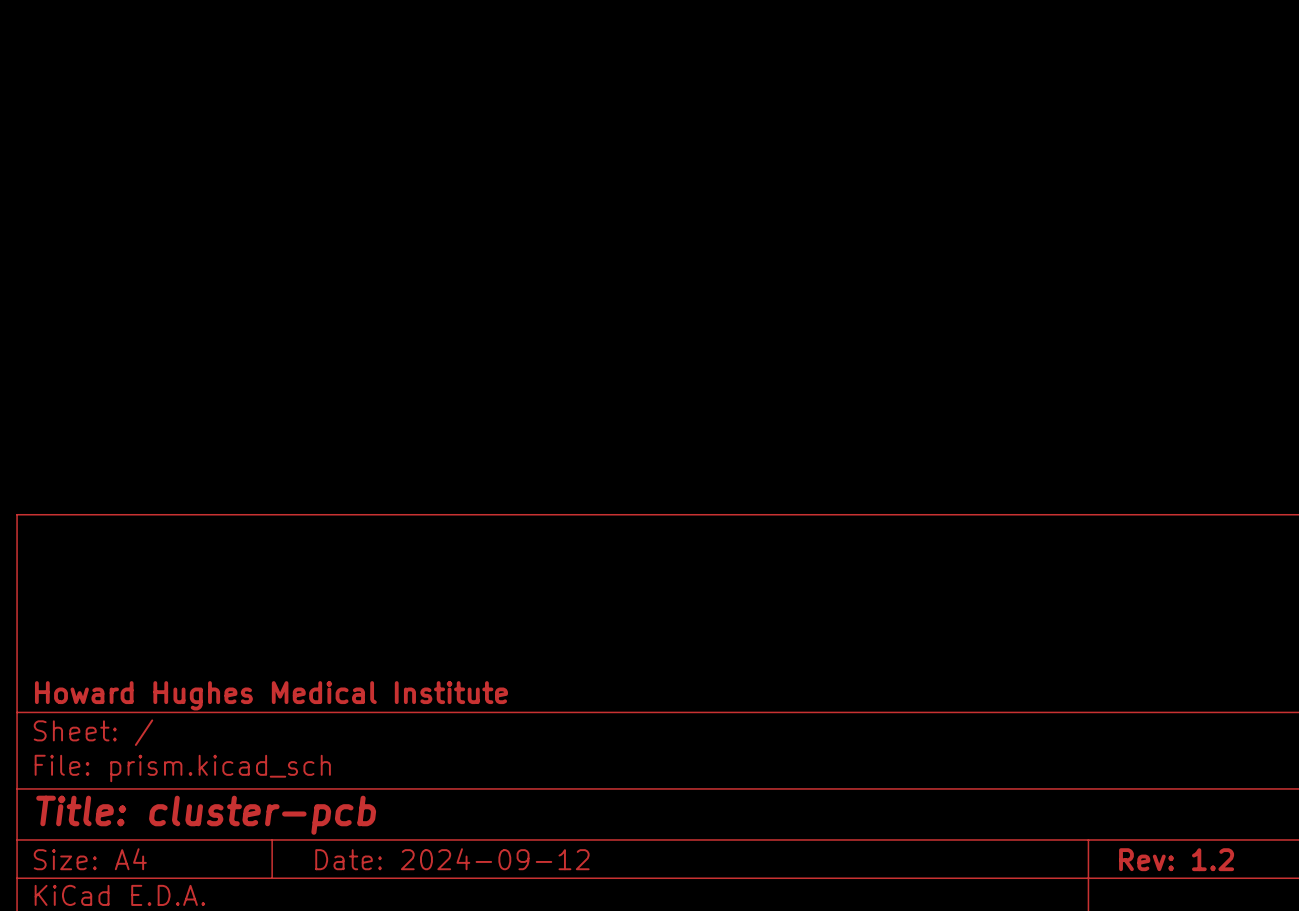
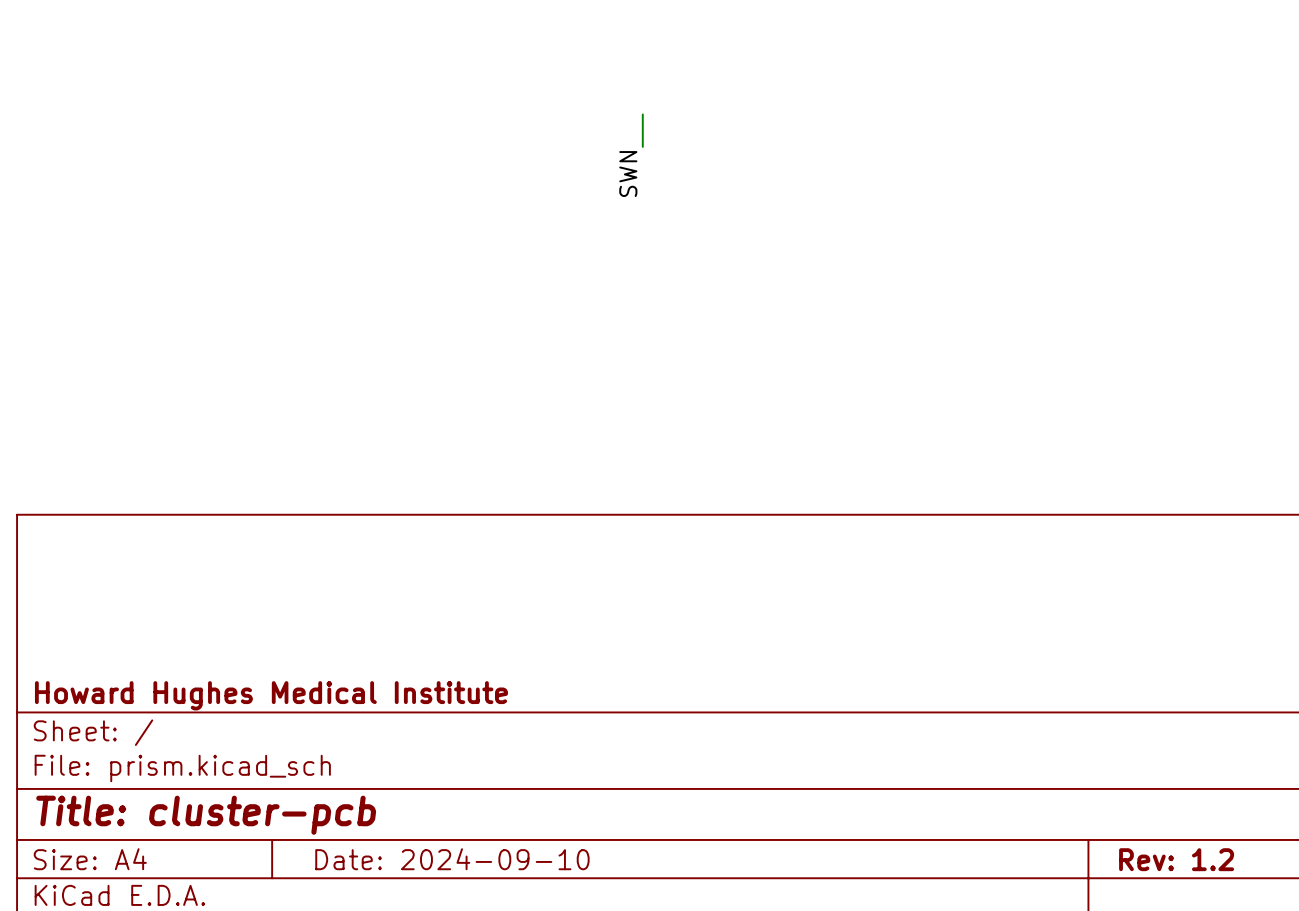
wire: none -> (642, 114) (642, 146)
label: none -> SWN (628, 174)
title block: Date: 2024-09-12 (452, 859) -> Date: 2024-09-10 (452, 859)

